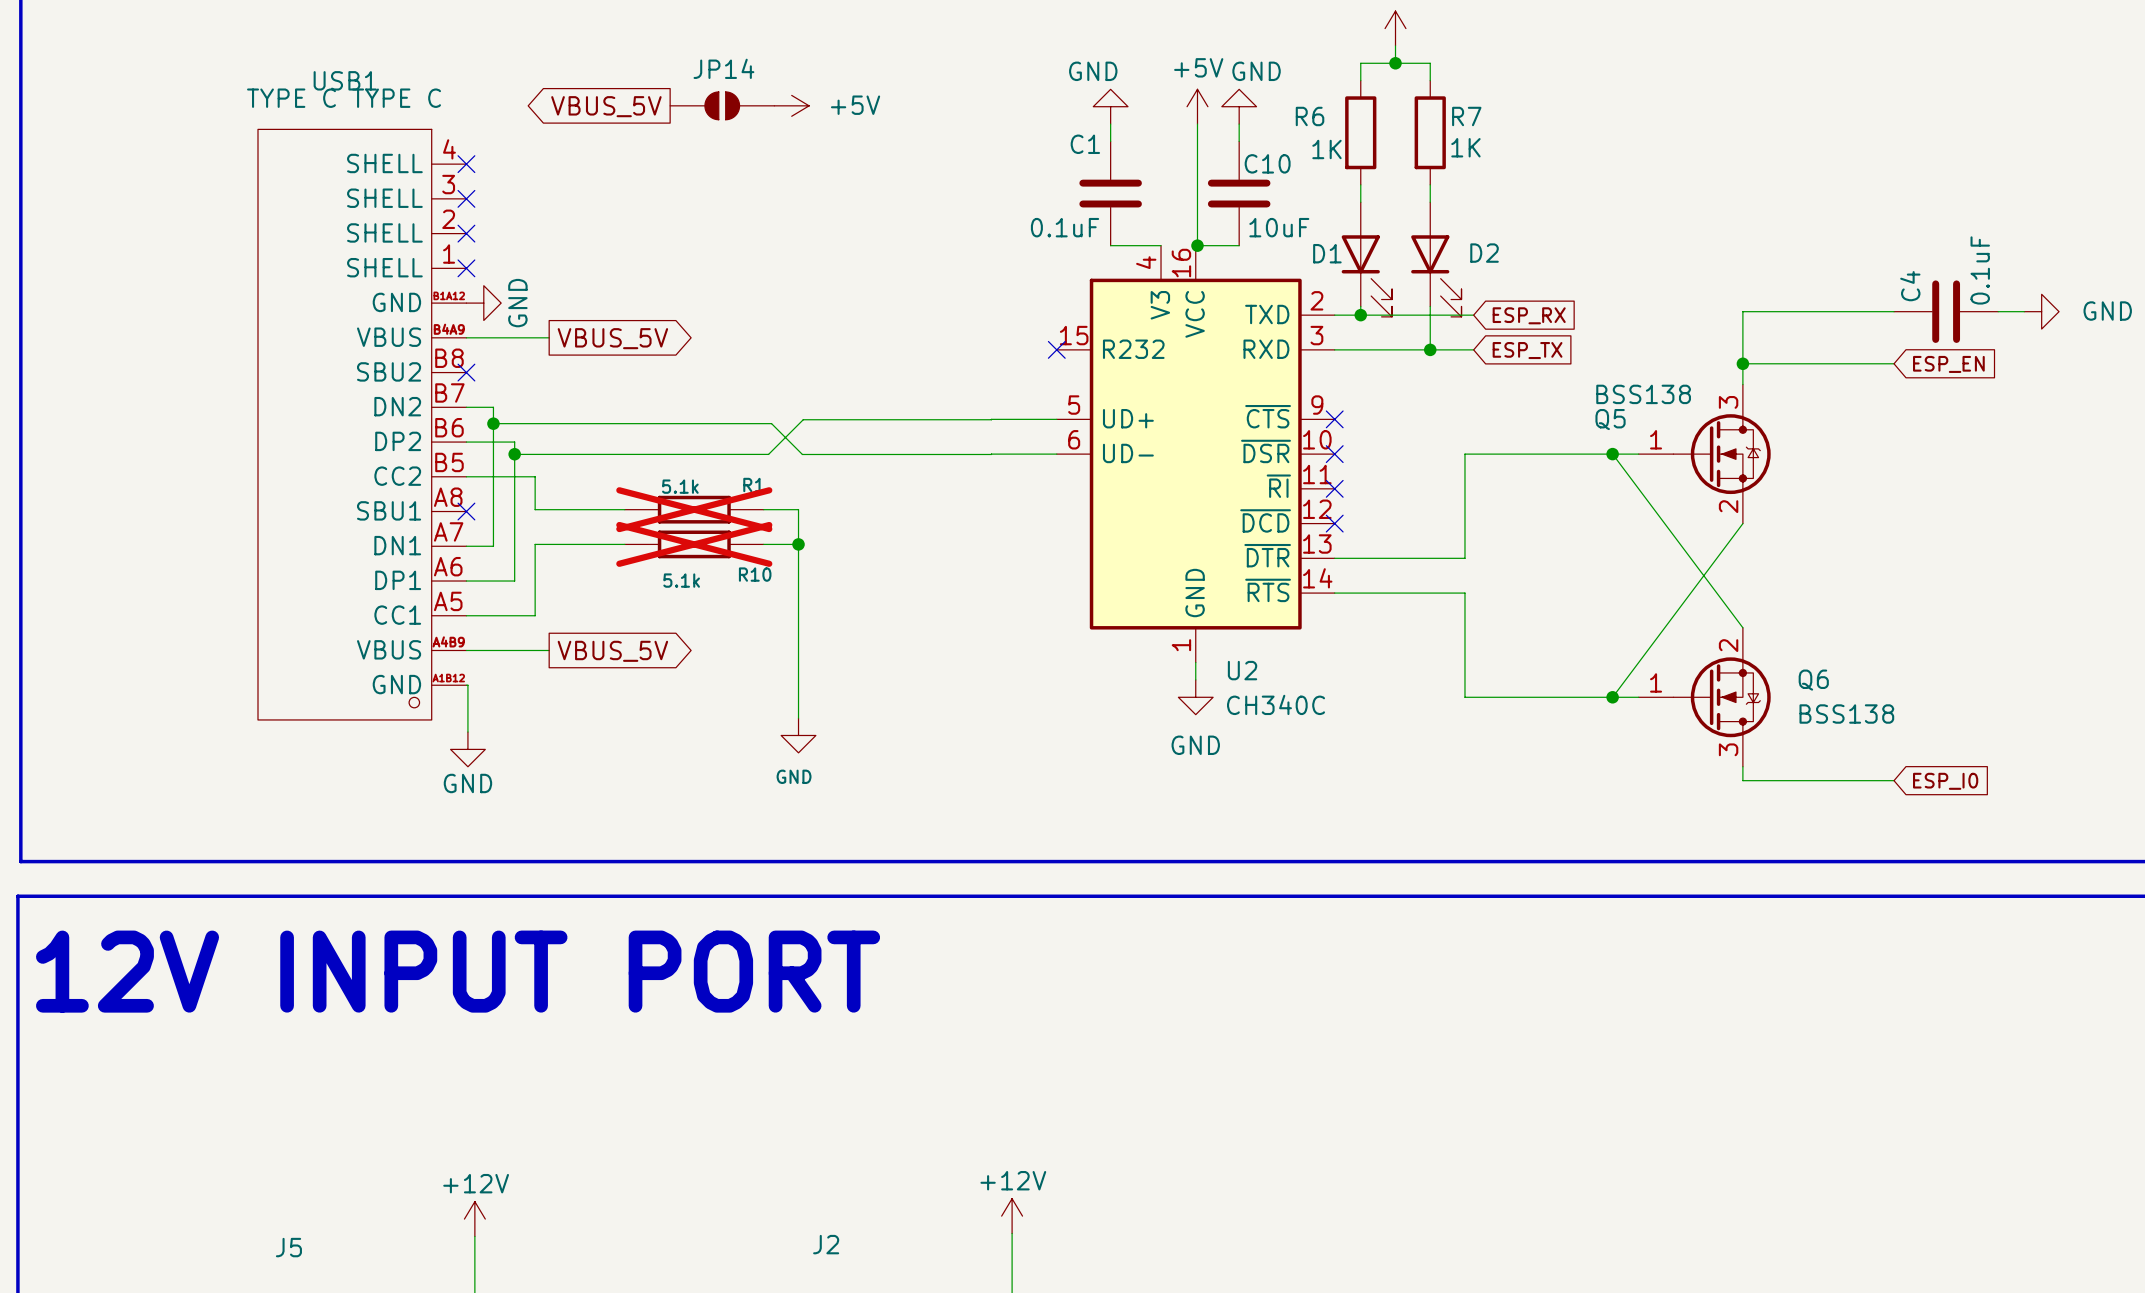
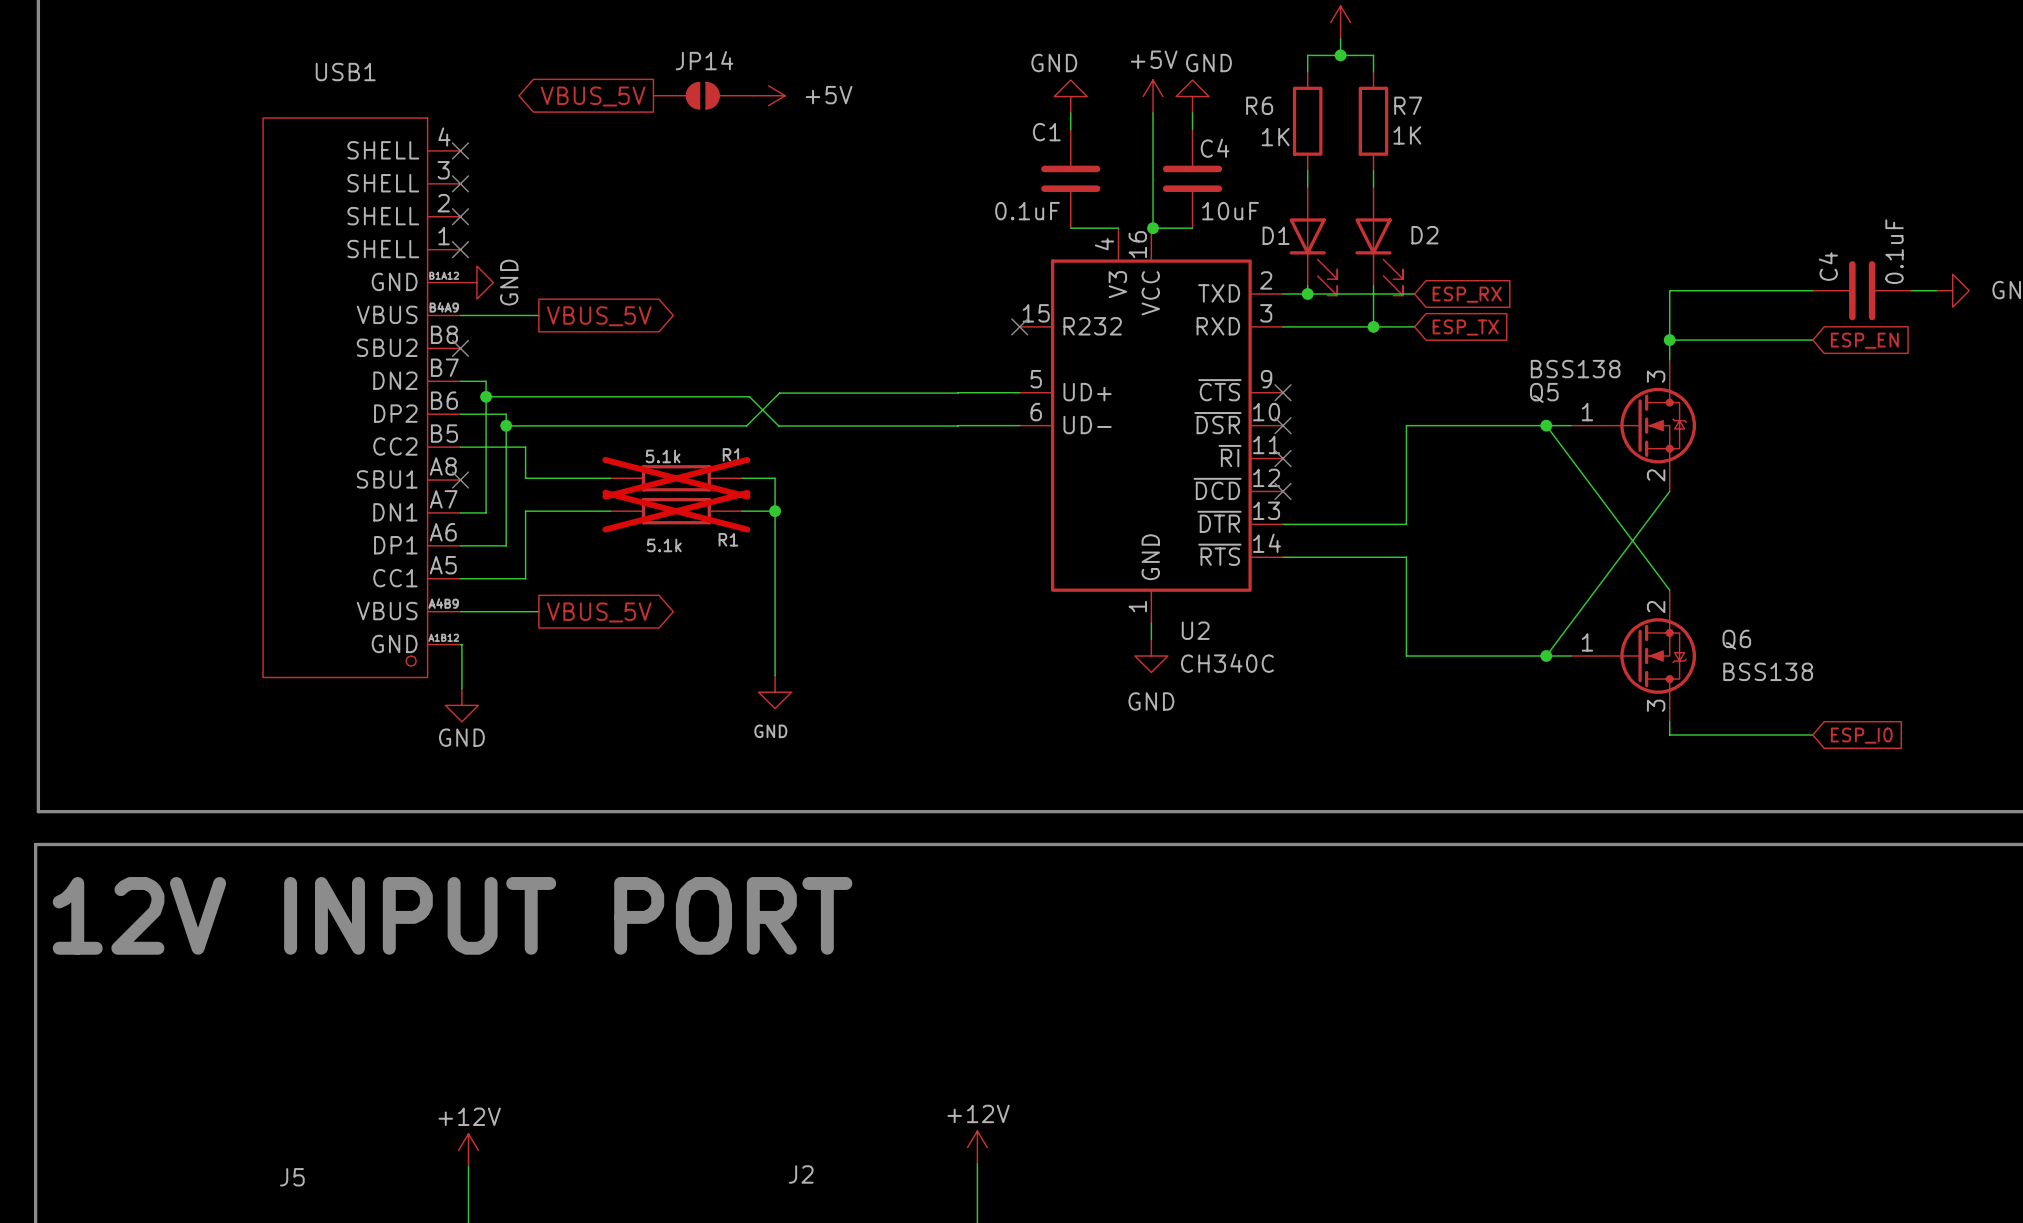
USB1 value: TYPE C TYPE C (344, 98) -> none
C10 name: C10 (1267, 163) -> C4 (1215, 148)
R10 name: R10 (755, 574) -> R1 (728, 539)

